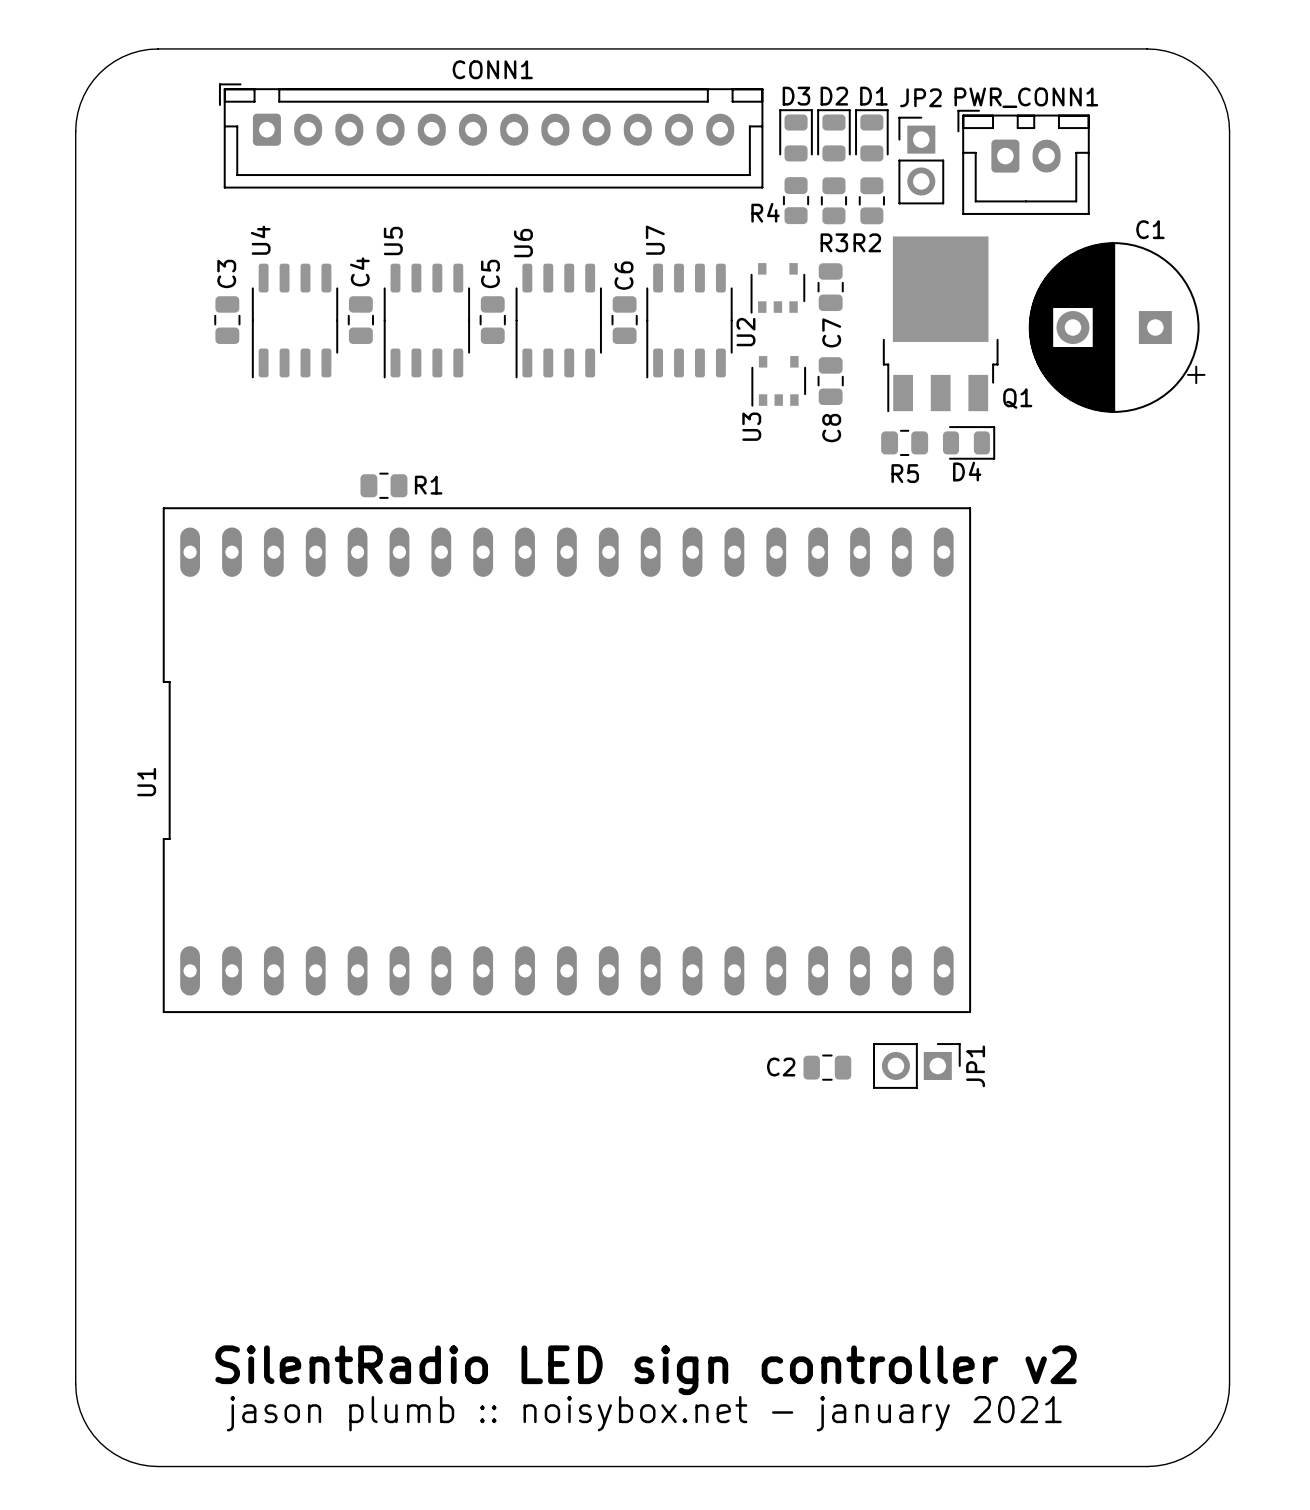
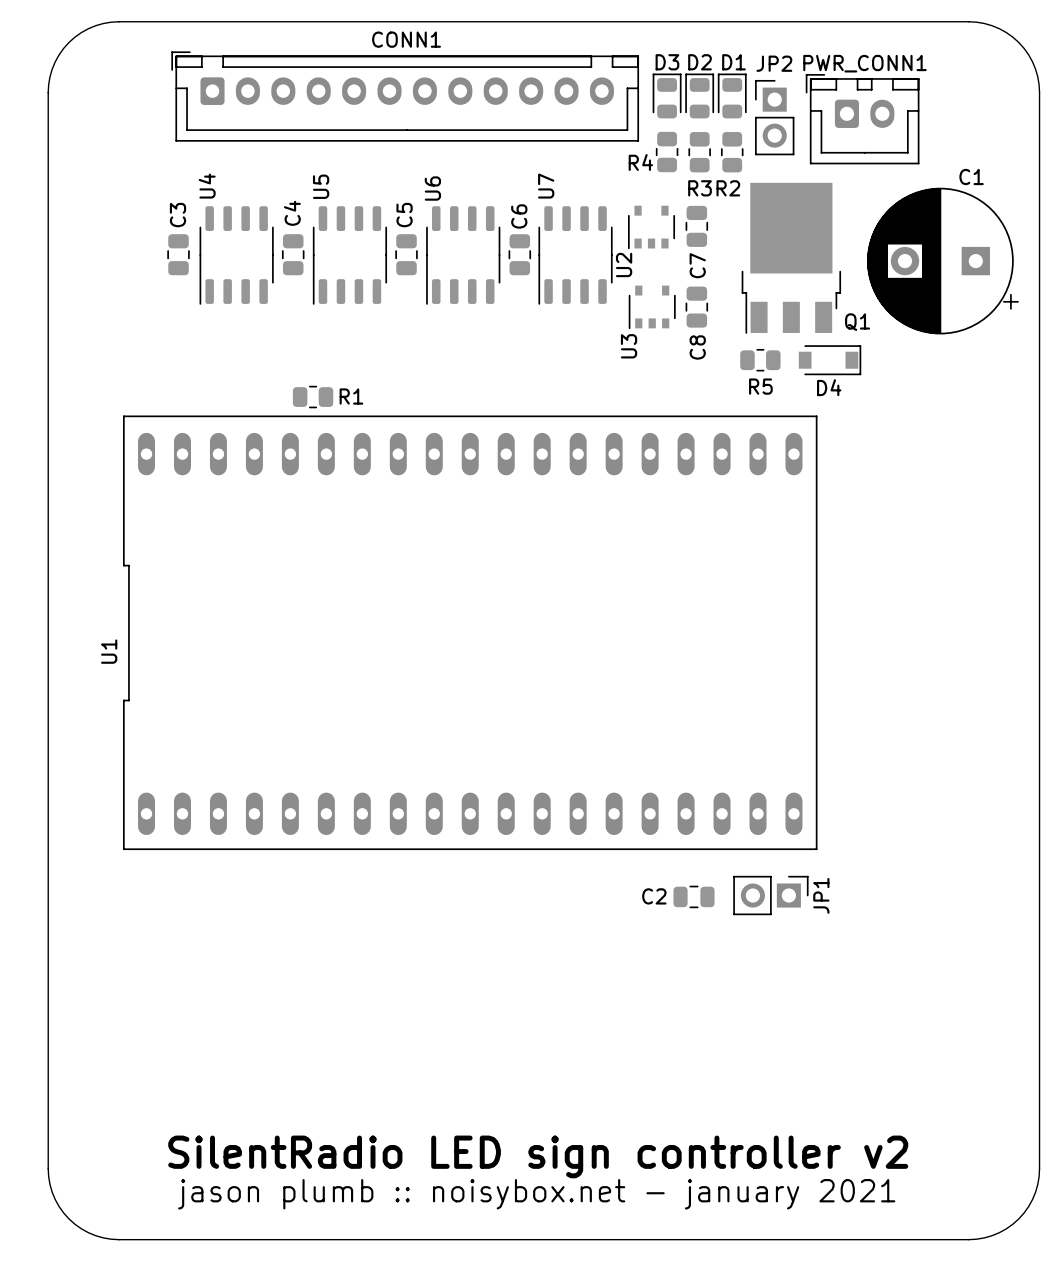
D4 footprint: [942, 426, 996, 460] -> [798, 345, 862, 376]

